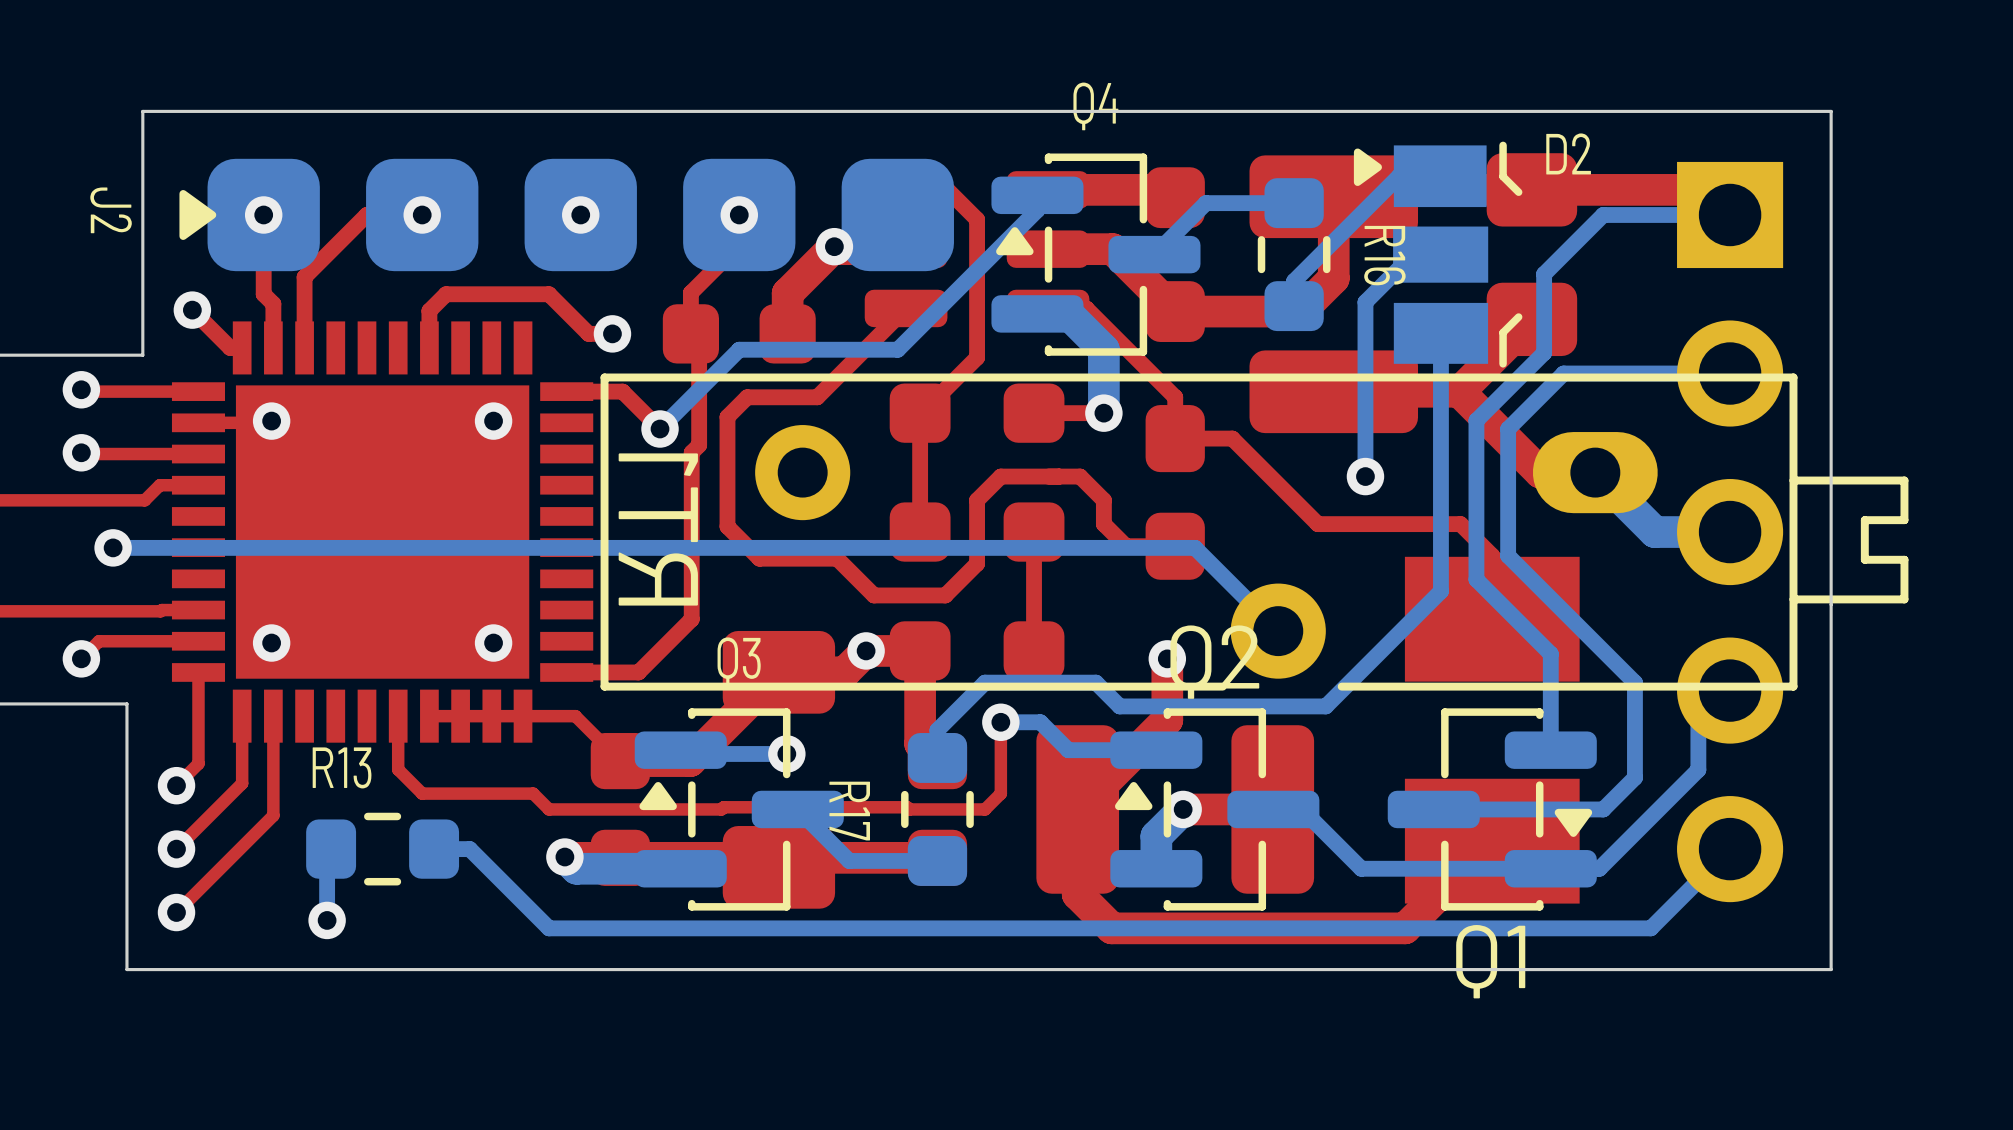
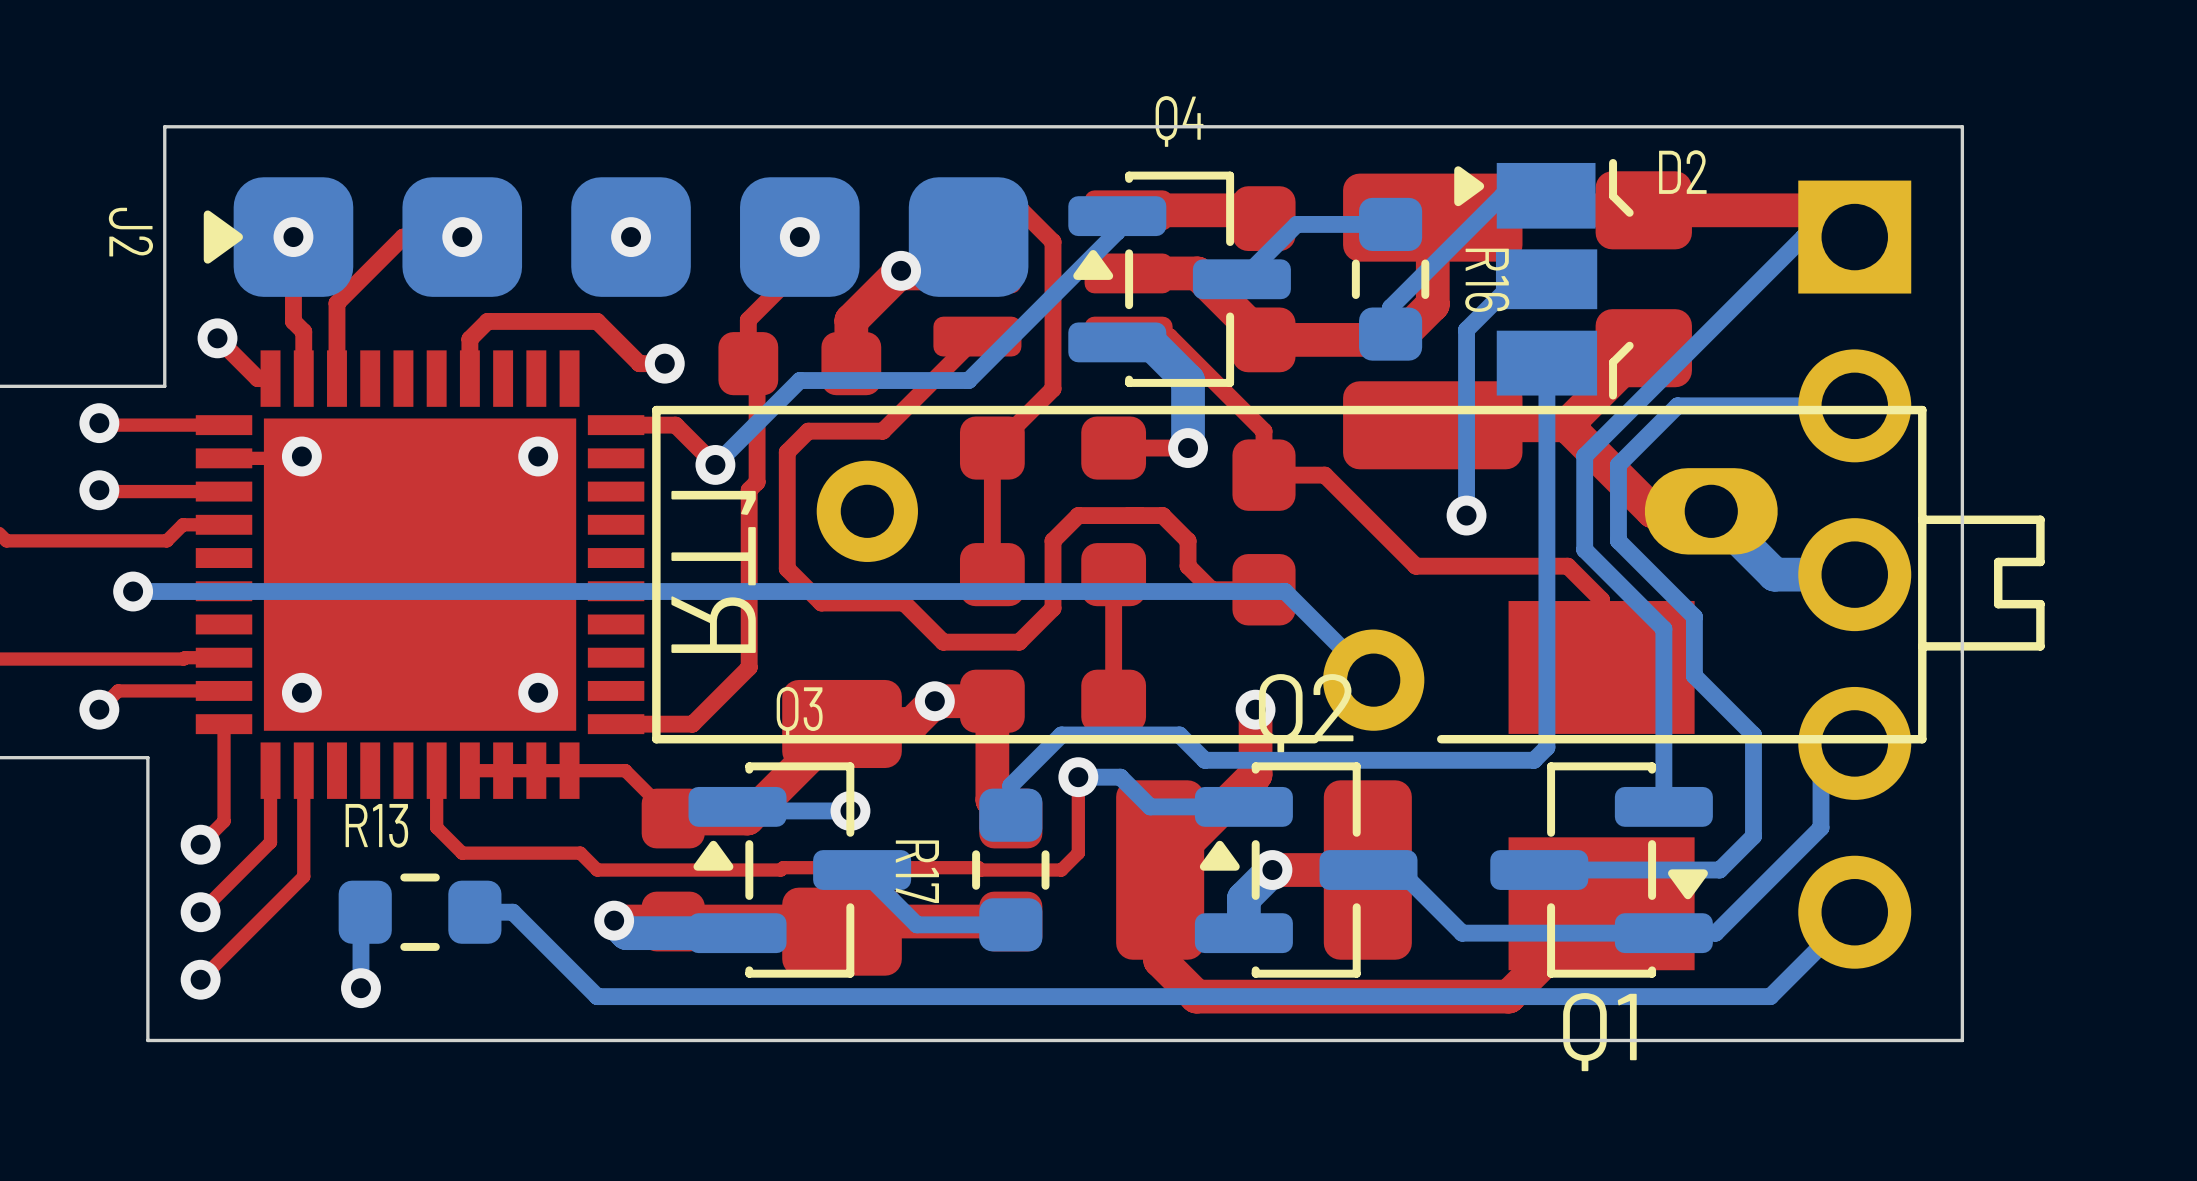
bottom track: (1682, 214) (1603, 214) (1544, 274) (1544, 352) -> (1803, 237) (1656, 383)
bottom track: (1508, 500) (1508, 555) (1579, 627) -> (1618, 540) (1694, 616) (1694, 675)
bottom track: (1476, 508) (1476, 579) (1550, 653) -> (1584, 549) (1663, 628) (1663, 704)
bottom track: (1440, 591) (1325, 706) -> (1546, 637) (1546, 747) (1534, 760) (1424, 760)

